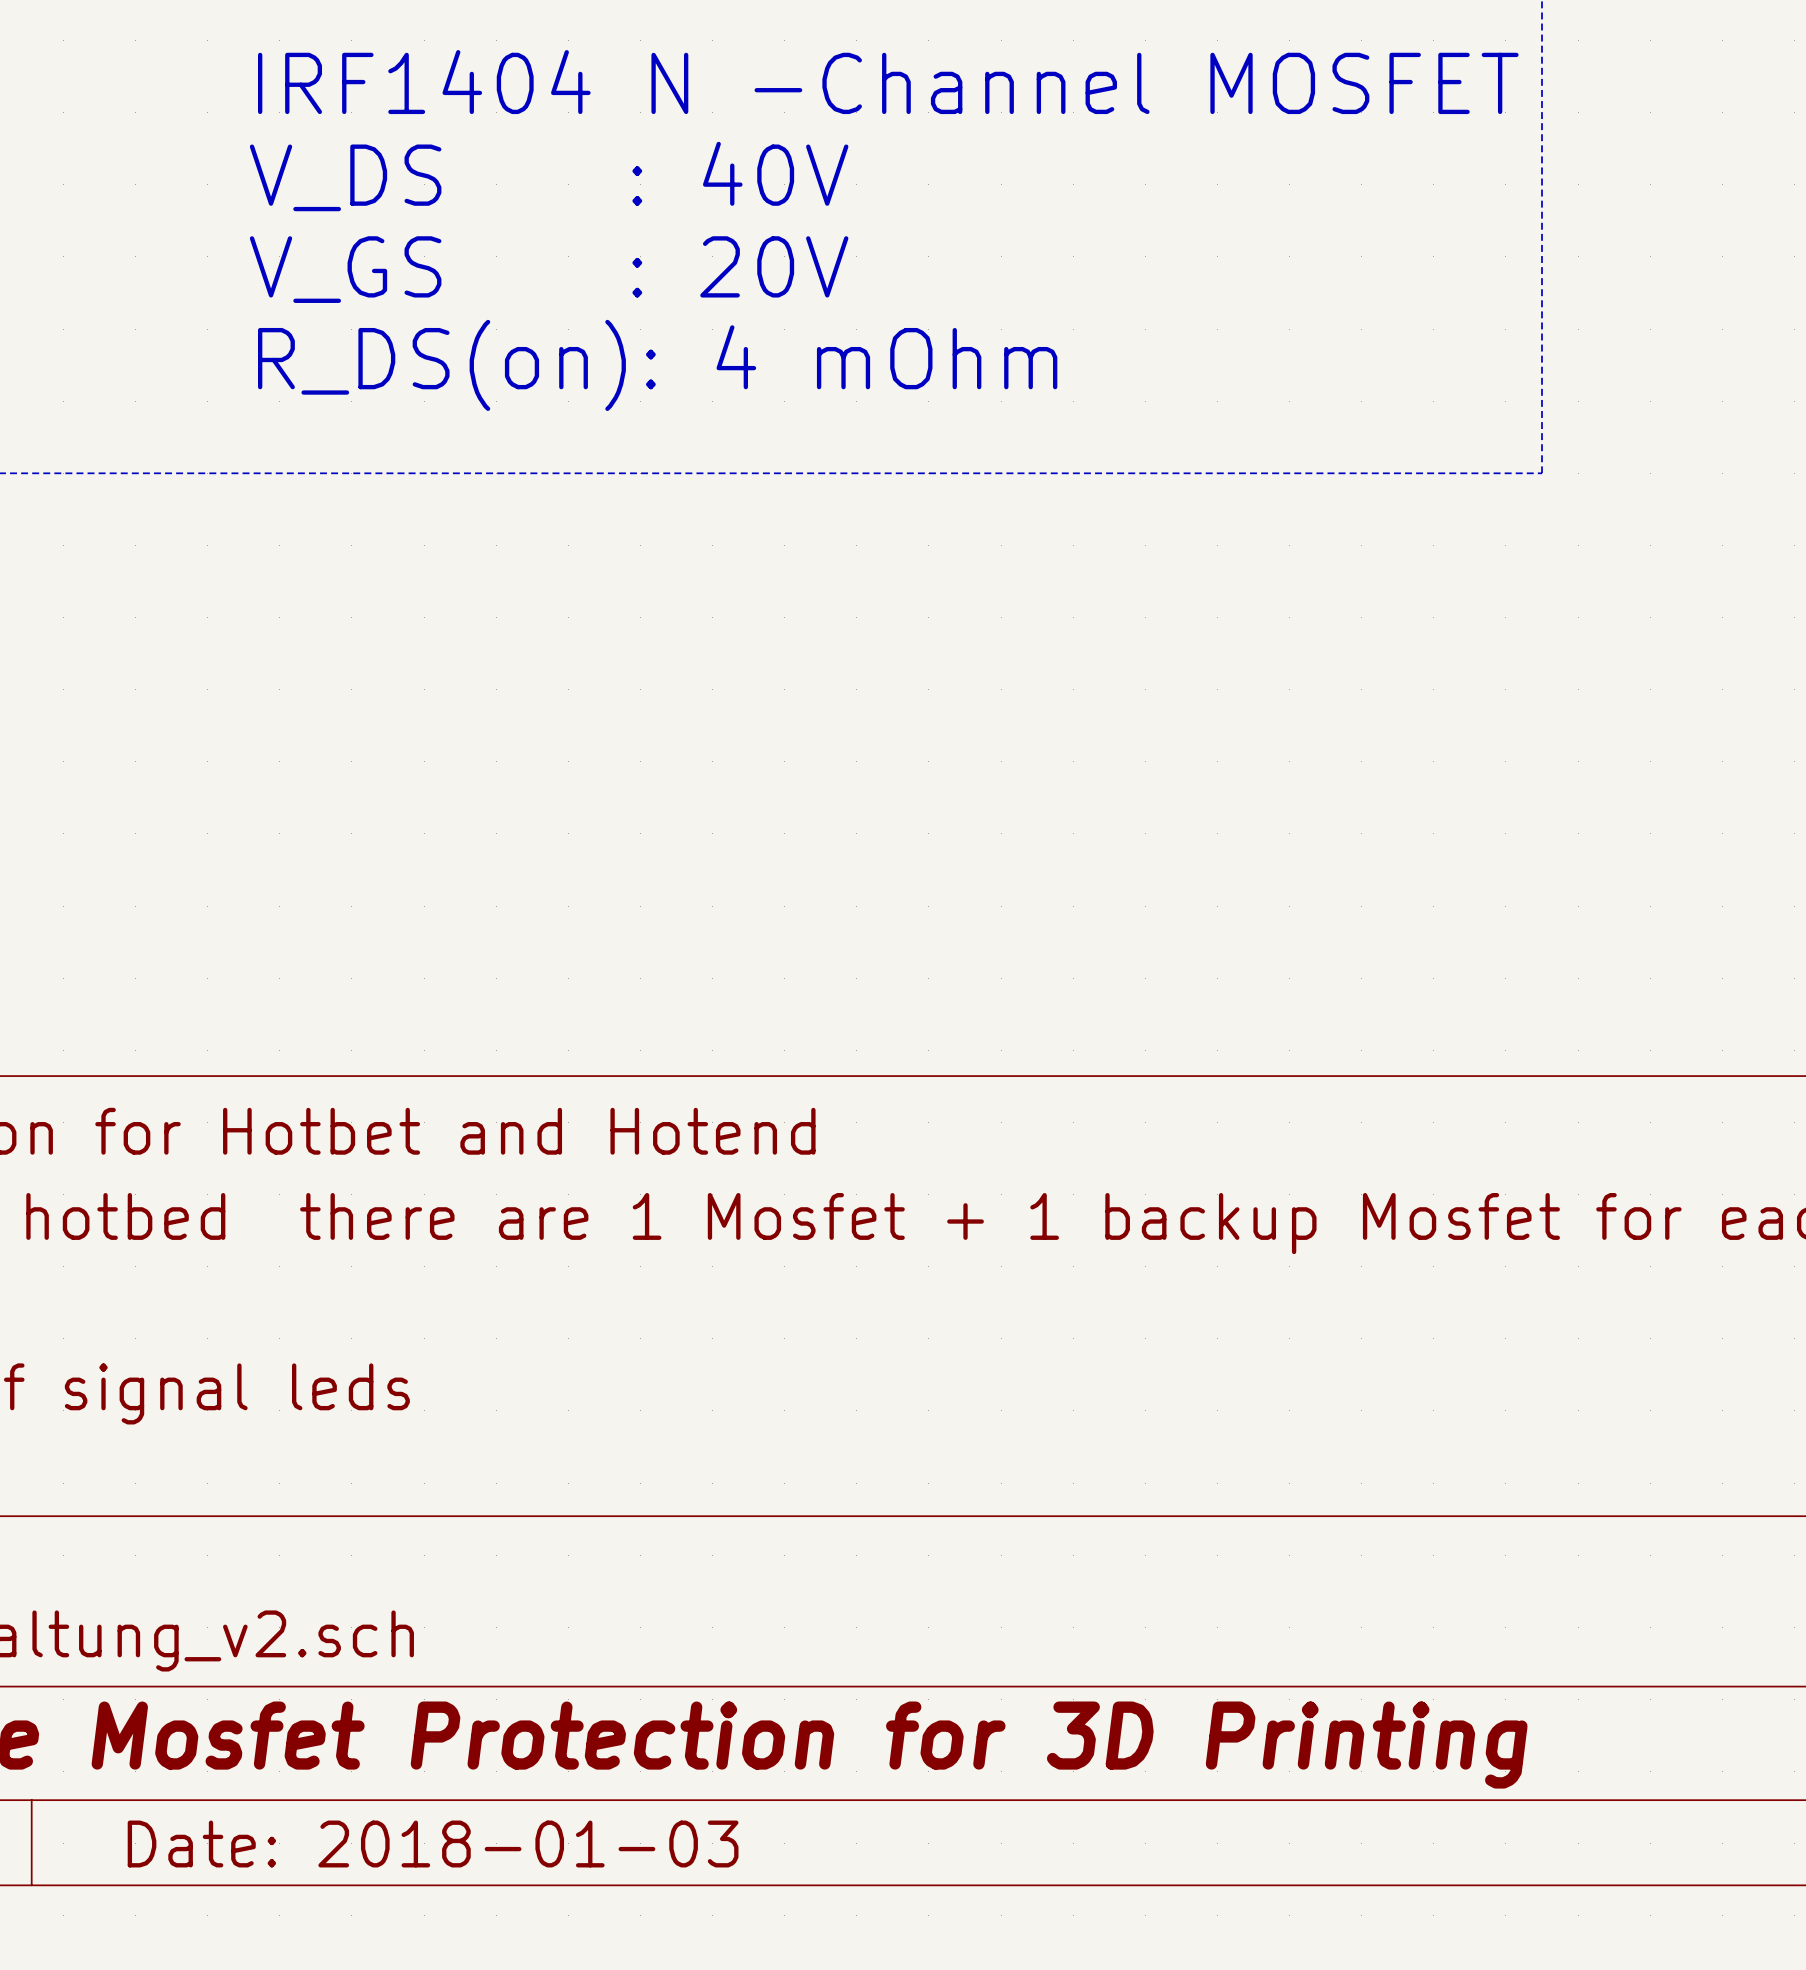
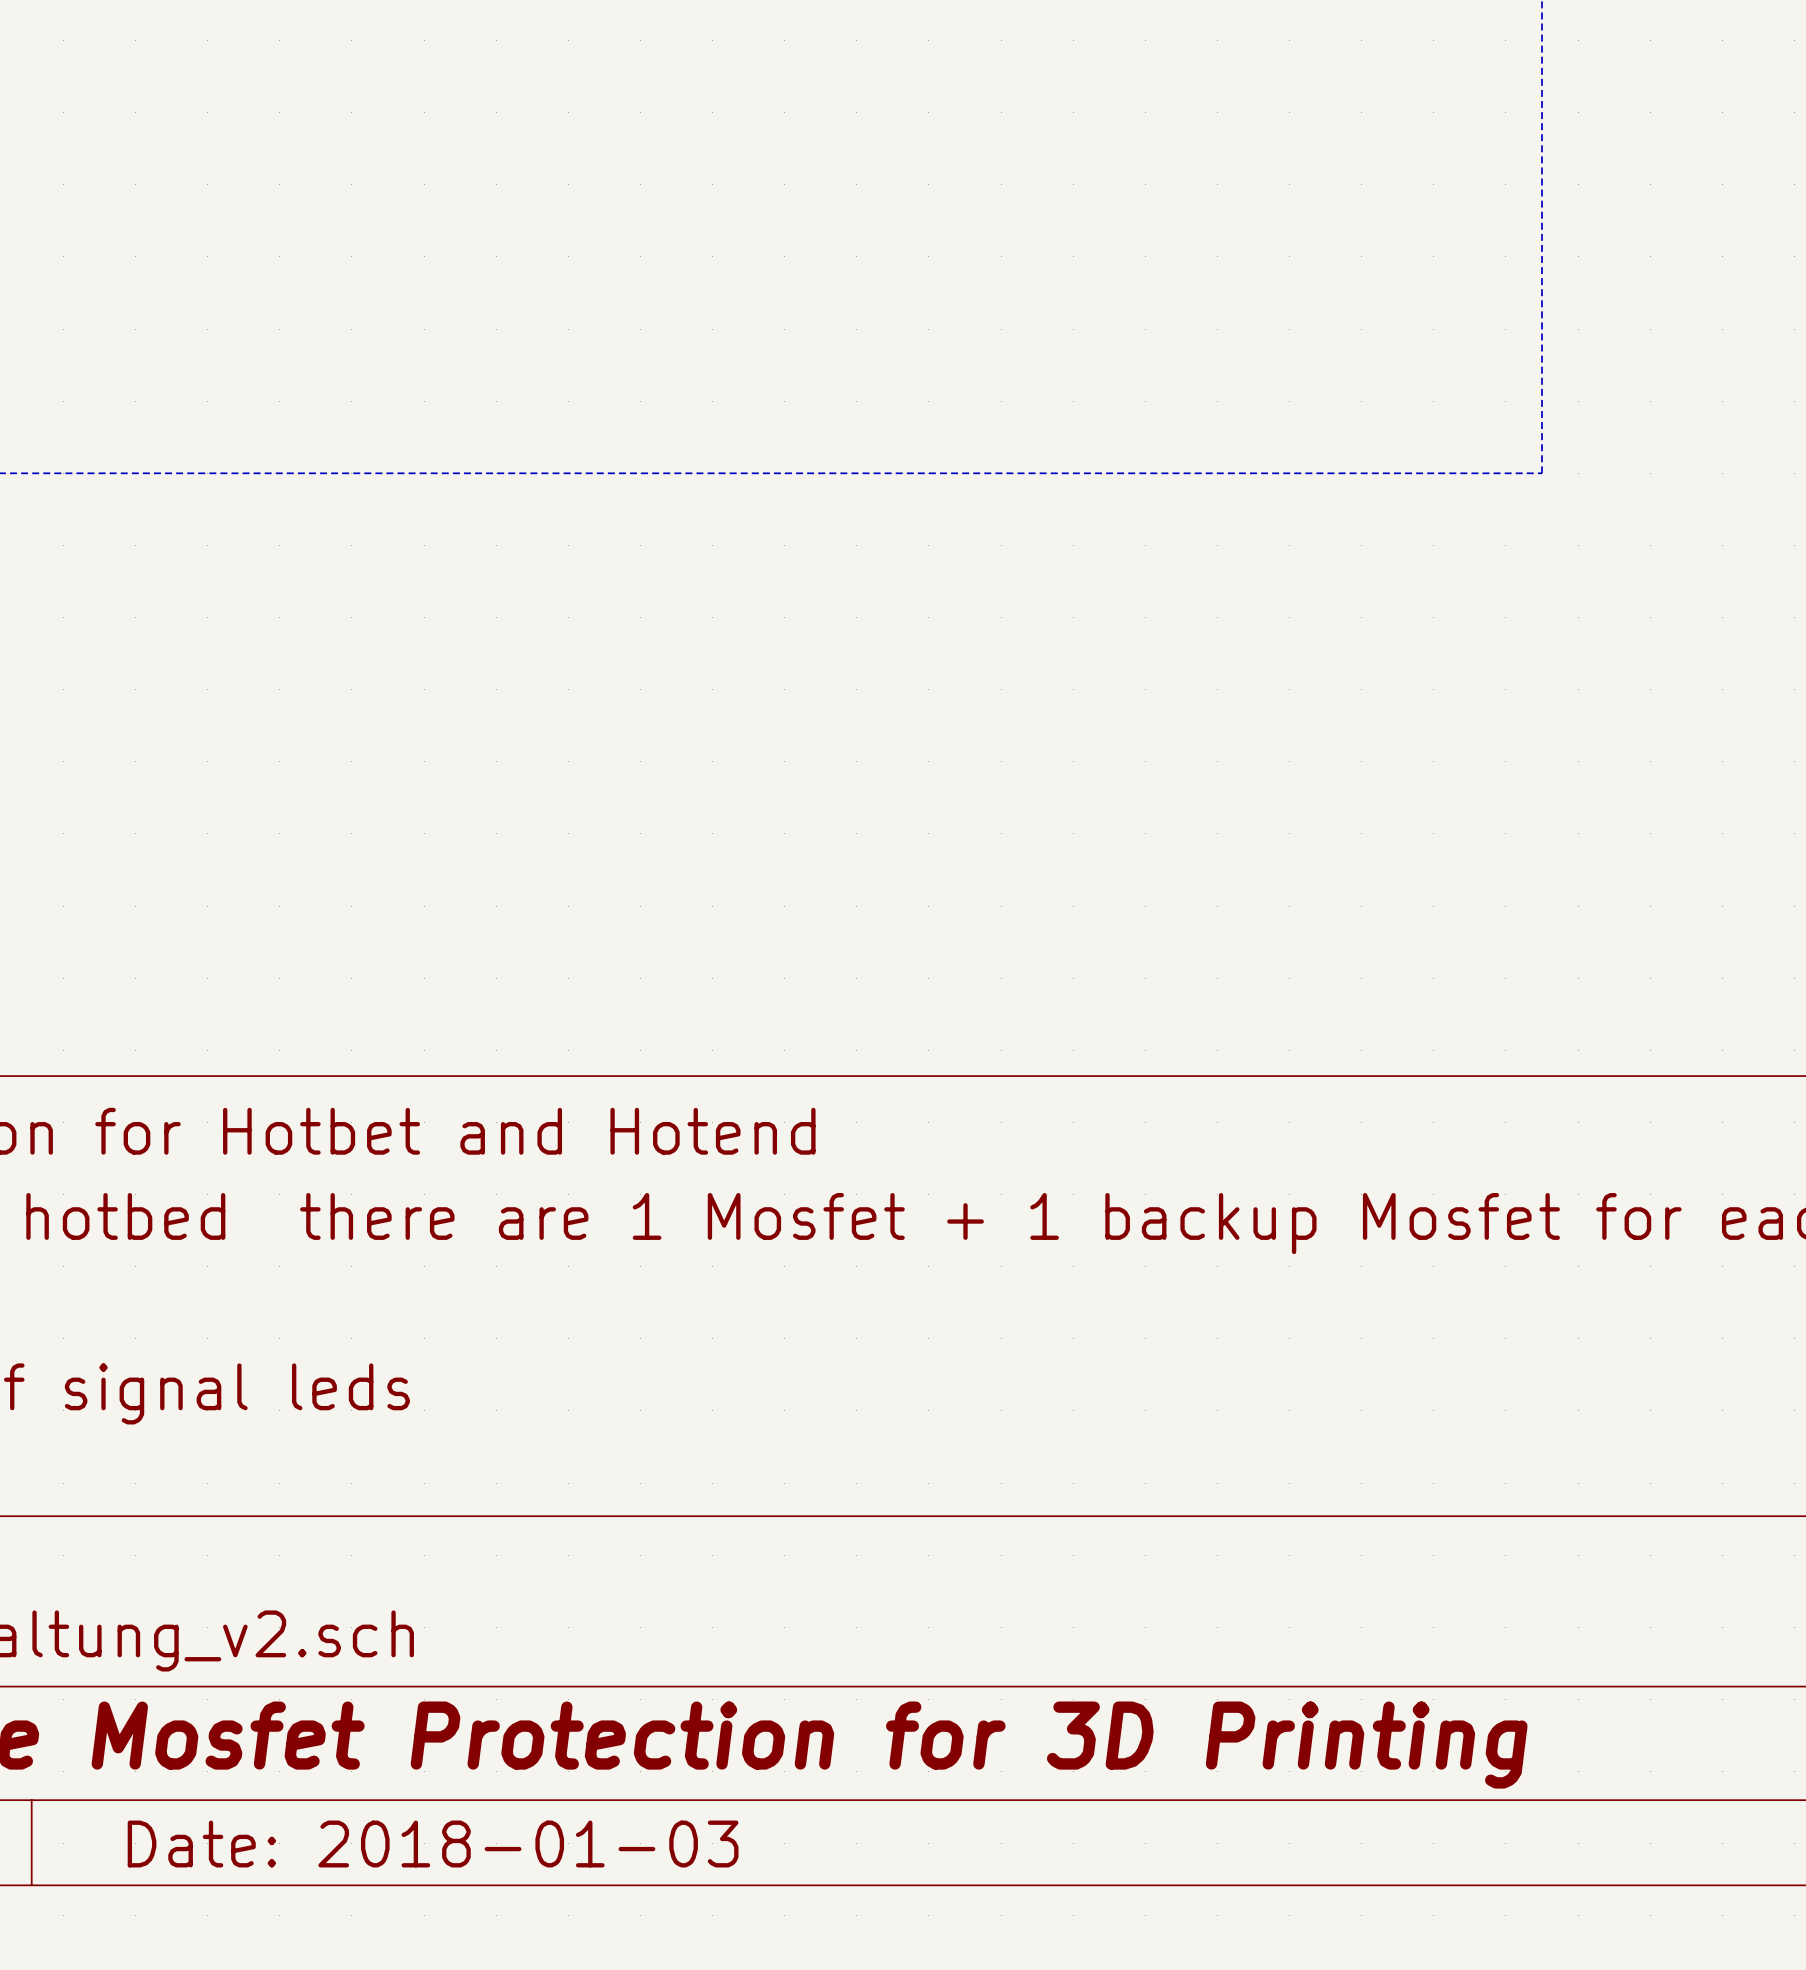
text: IRF1404 N -Channel MOSFET (888, 82) -> none
text: V_DS : 40V (549, 176) -> none
text: V_GS : 20V (549, 269) -> none
text: R_DS(on): 4 mOhm (657, 365) -> none

